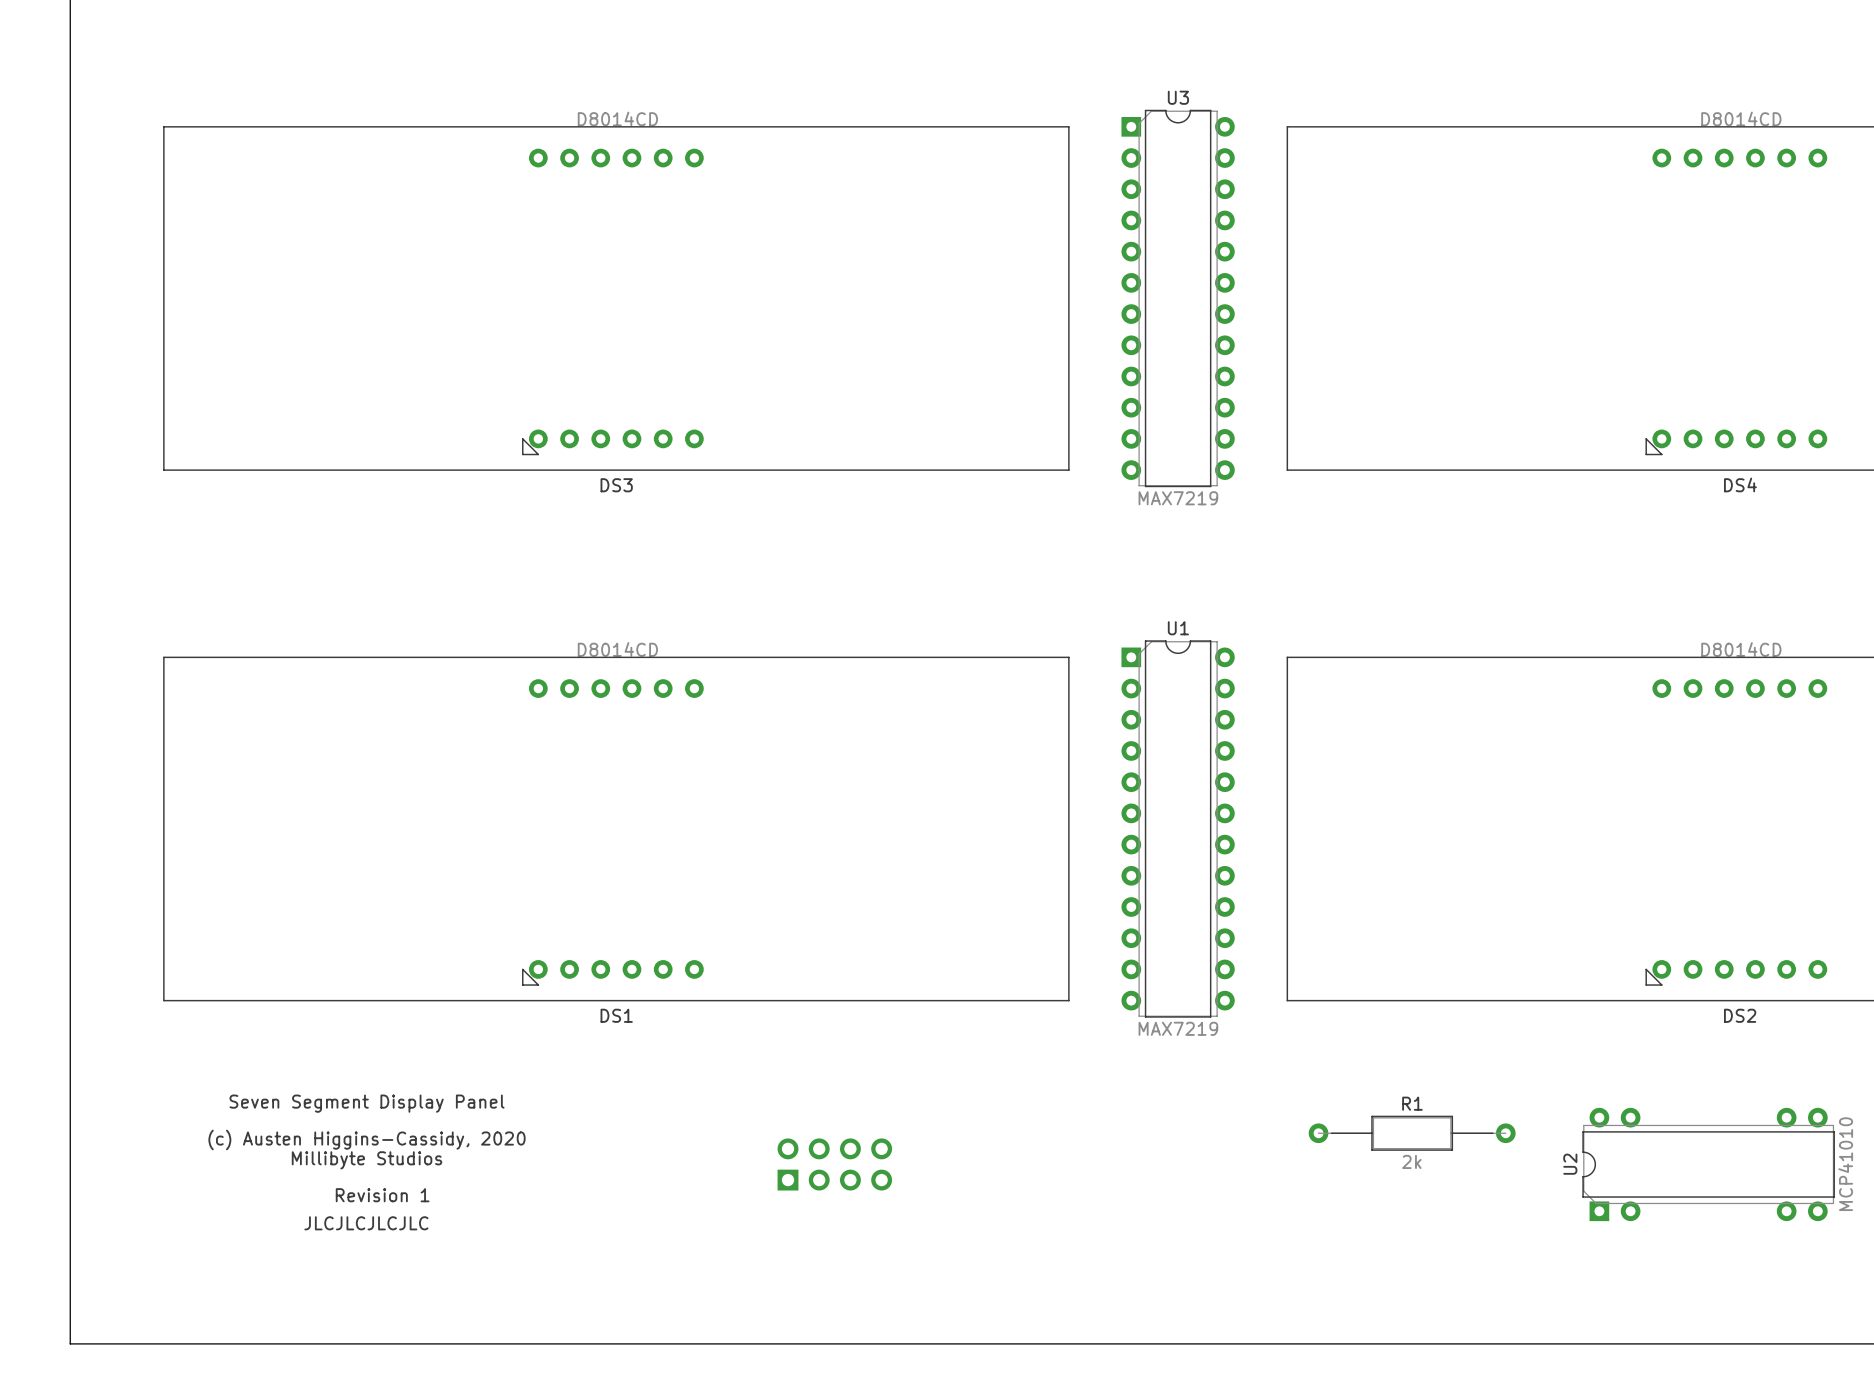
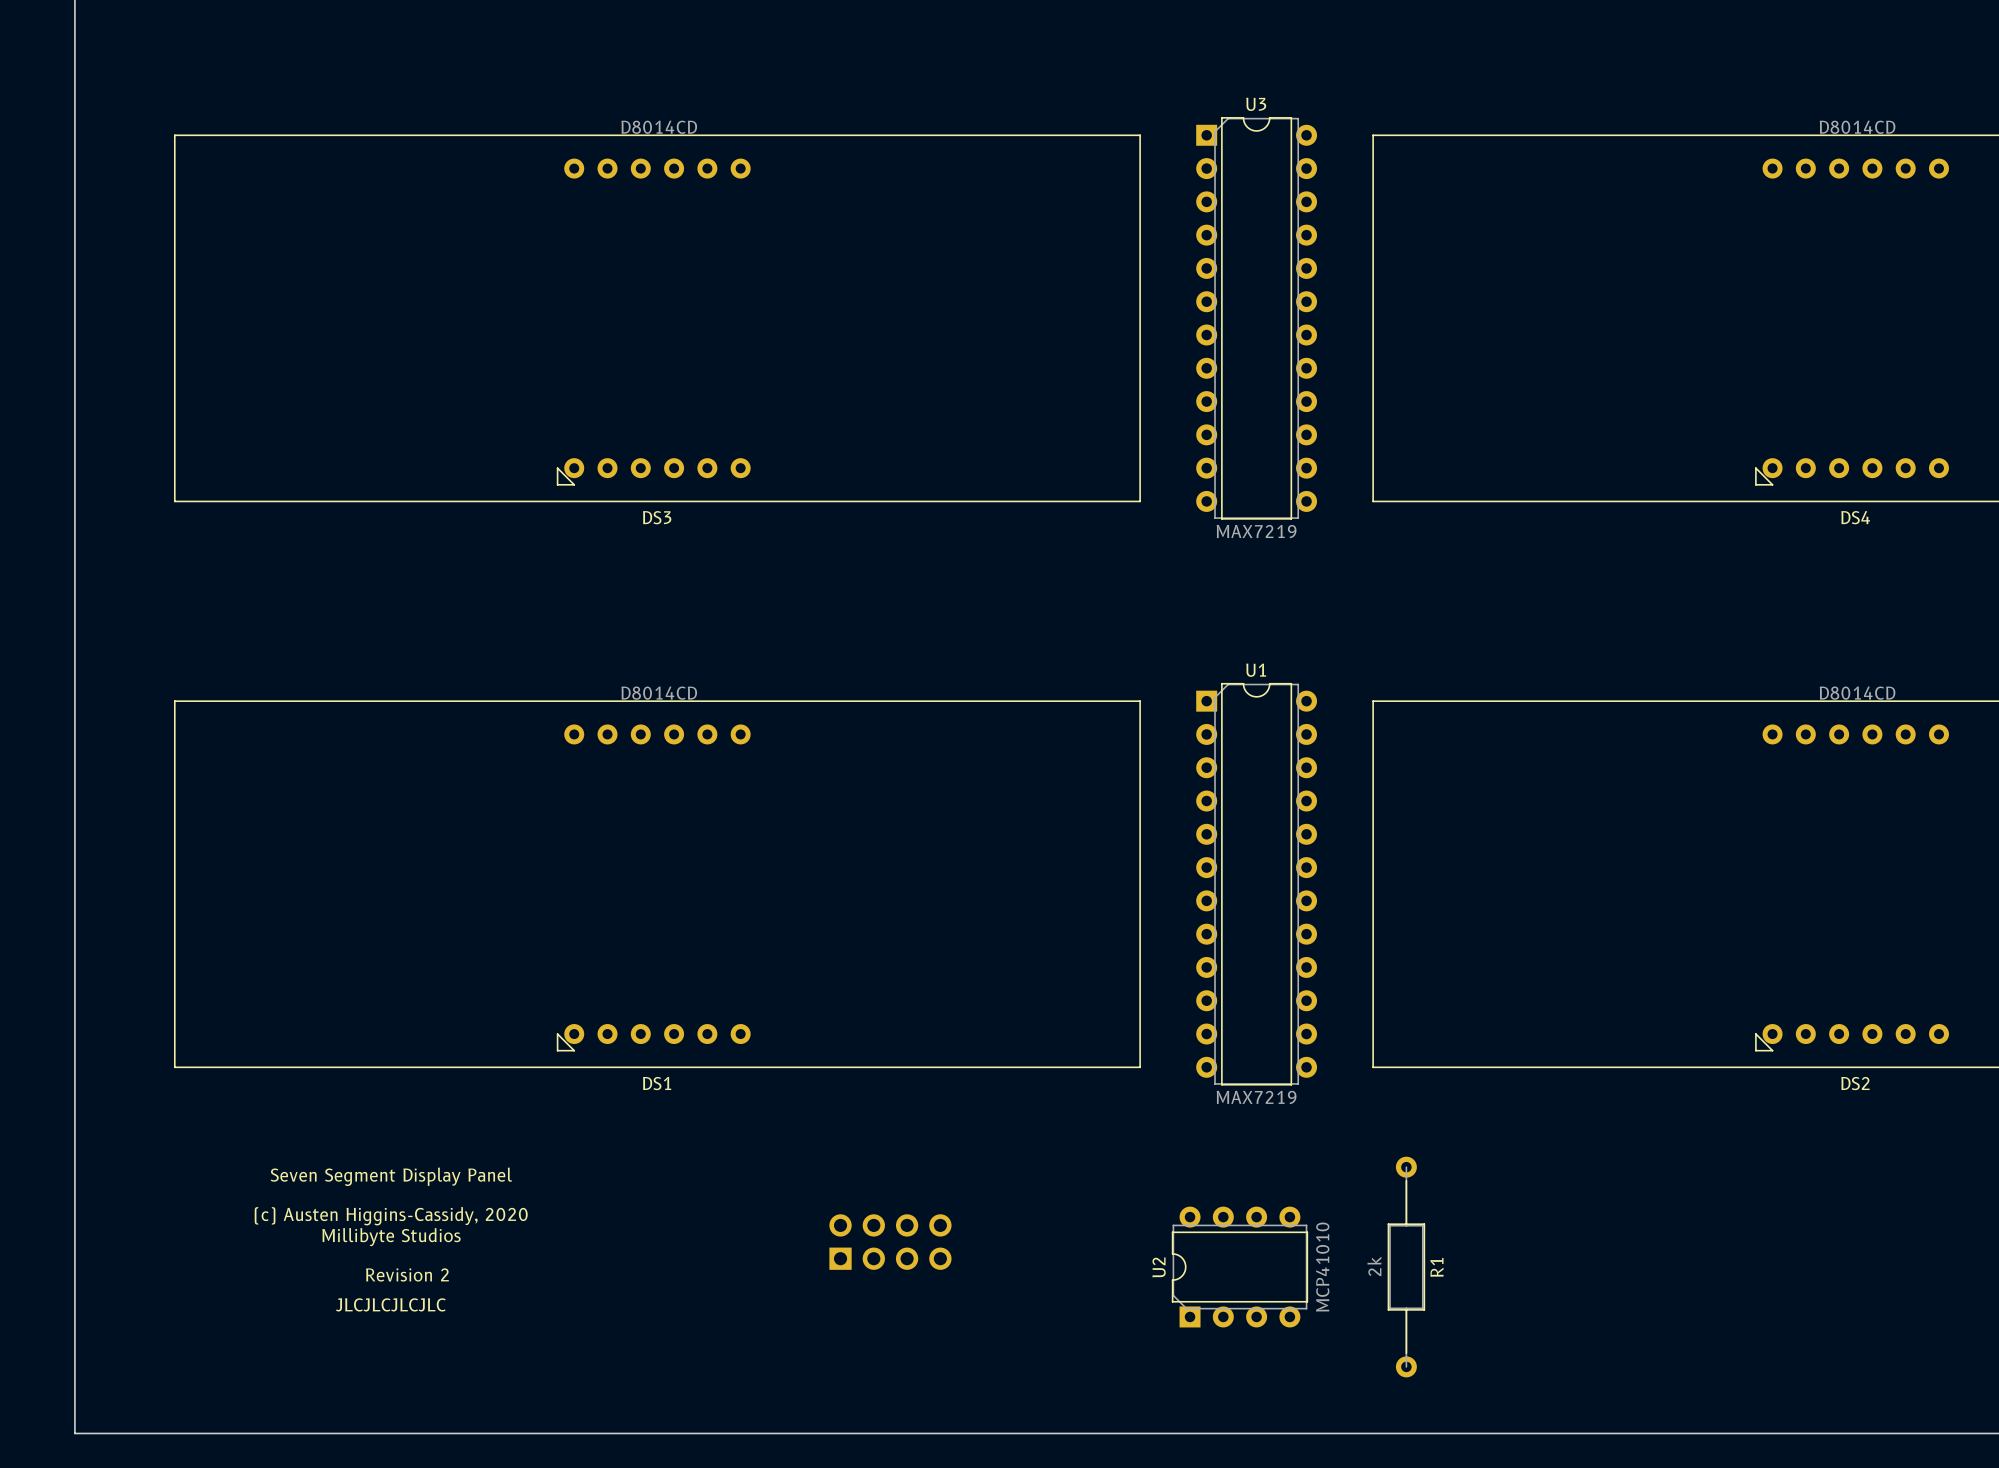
U2 footprint: [1582, 1107, 1835, 1222] -> [1171, 1206, 1309, 1328]
R1 rotation: 0° (1412, 1133) -> 90° clockwise (1406, 1267)
U2 name position: U2 (1570, 1164) -> U2 (1159, 1267)
U2 value position: MCP41010 (1845, 1164) -> MCP41010 (1322, 1267)
text: Revision 1 (382, 1195) -> Revision 2 (407, 1274)

